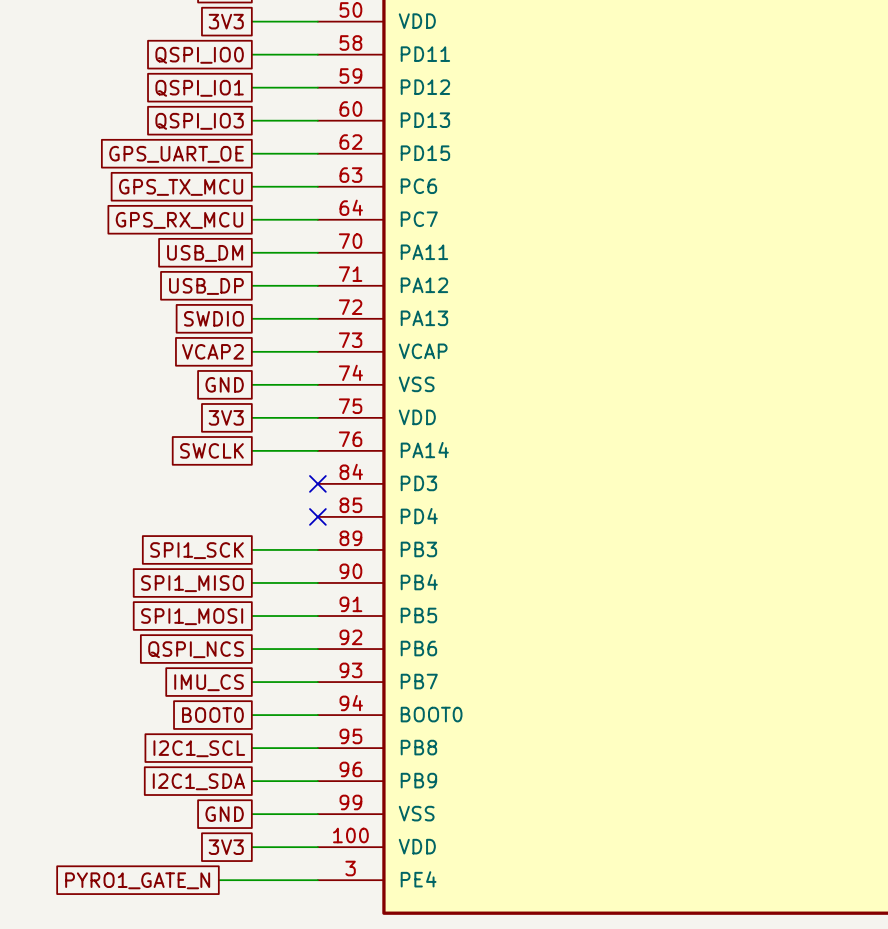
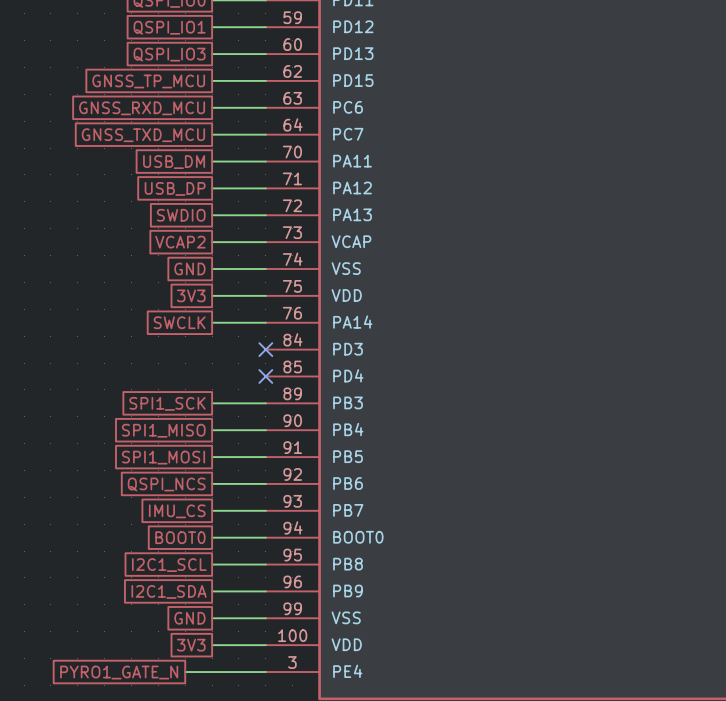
global label: GPS_UART_OE (176, 154) -> GNSS_TP_MCU (148, 81)
global label: GPS_TX_MCU (181, 187) -> GNSS_RXD_MCU (142, 108)
global label: GPS_RX_MCU (179, 220) -> GNSS_TXD_MCU (143, 135)

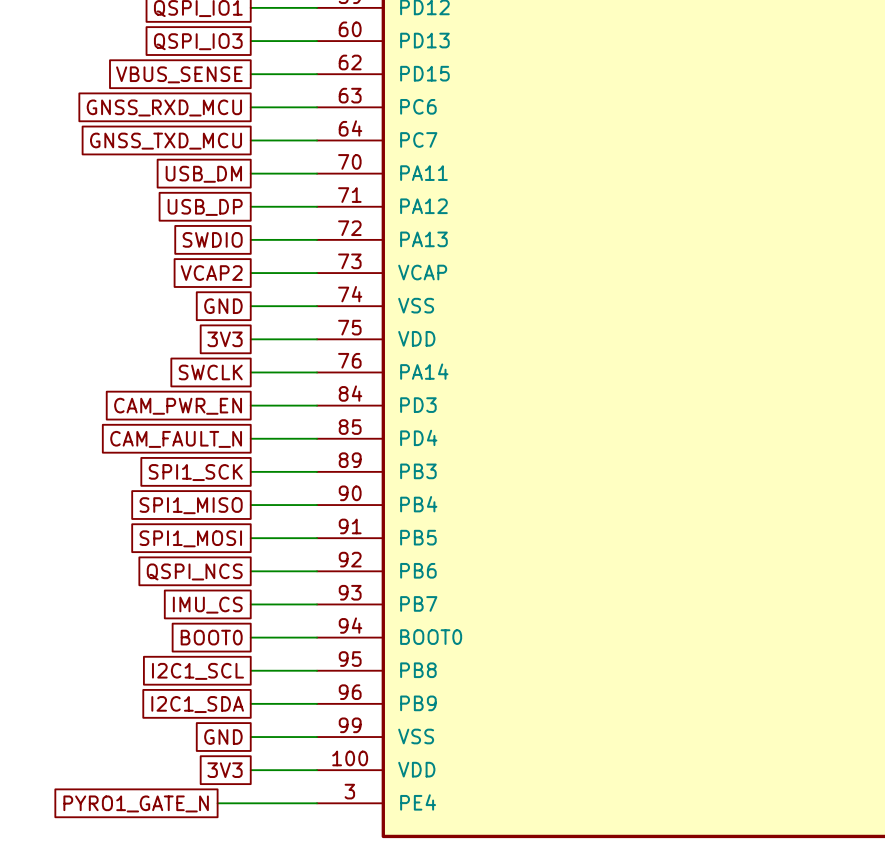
global label: GNSS_TP_MCU (148, 81) -> VBUS_SENSE (179, 74)
wire: none -> (250, 405) (317, 405)
no-connect mark: (265, 349) -> none
global label: none -> CAM_PWR_EN (178, 406)
wire: none -> (250, 438) (317, 438)
no-connect mark: (265, 376) -> none
global label: none -> CAM_FAULT_N (176, 439)

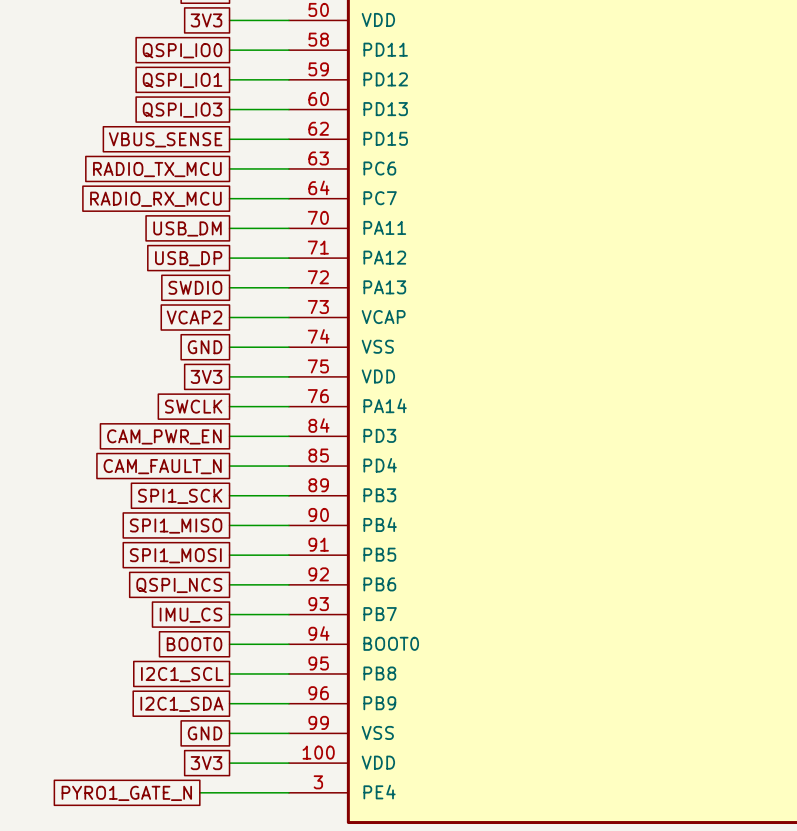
global label: GNSS_RXD_MCU (164, 107) -> RADIO_TX_MCU (157, 169)
global label: GNSS_TXD_MCU (166, 141) -> RADIO_RX_MCU (155, 199)

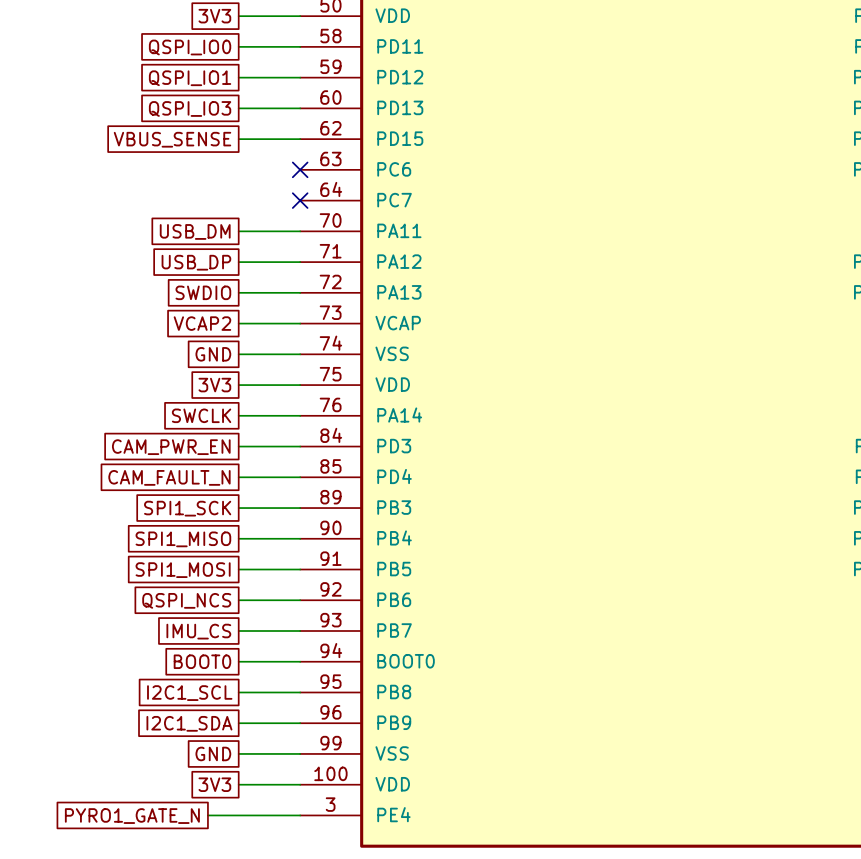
wire: (229, 168) (288, 168) -> none
no-connect mark: none -> (300, 169)
global label: RADIO_TX_MCU (157, 169) -> none
wire: (229, 198) (288, 198) -> none
no-connect mark: none -> (300, 200)
global label: RADIO_RX_MCU (155, 199) -> none

